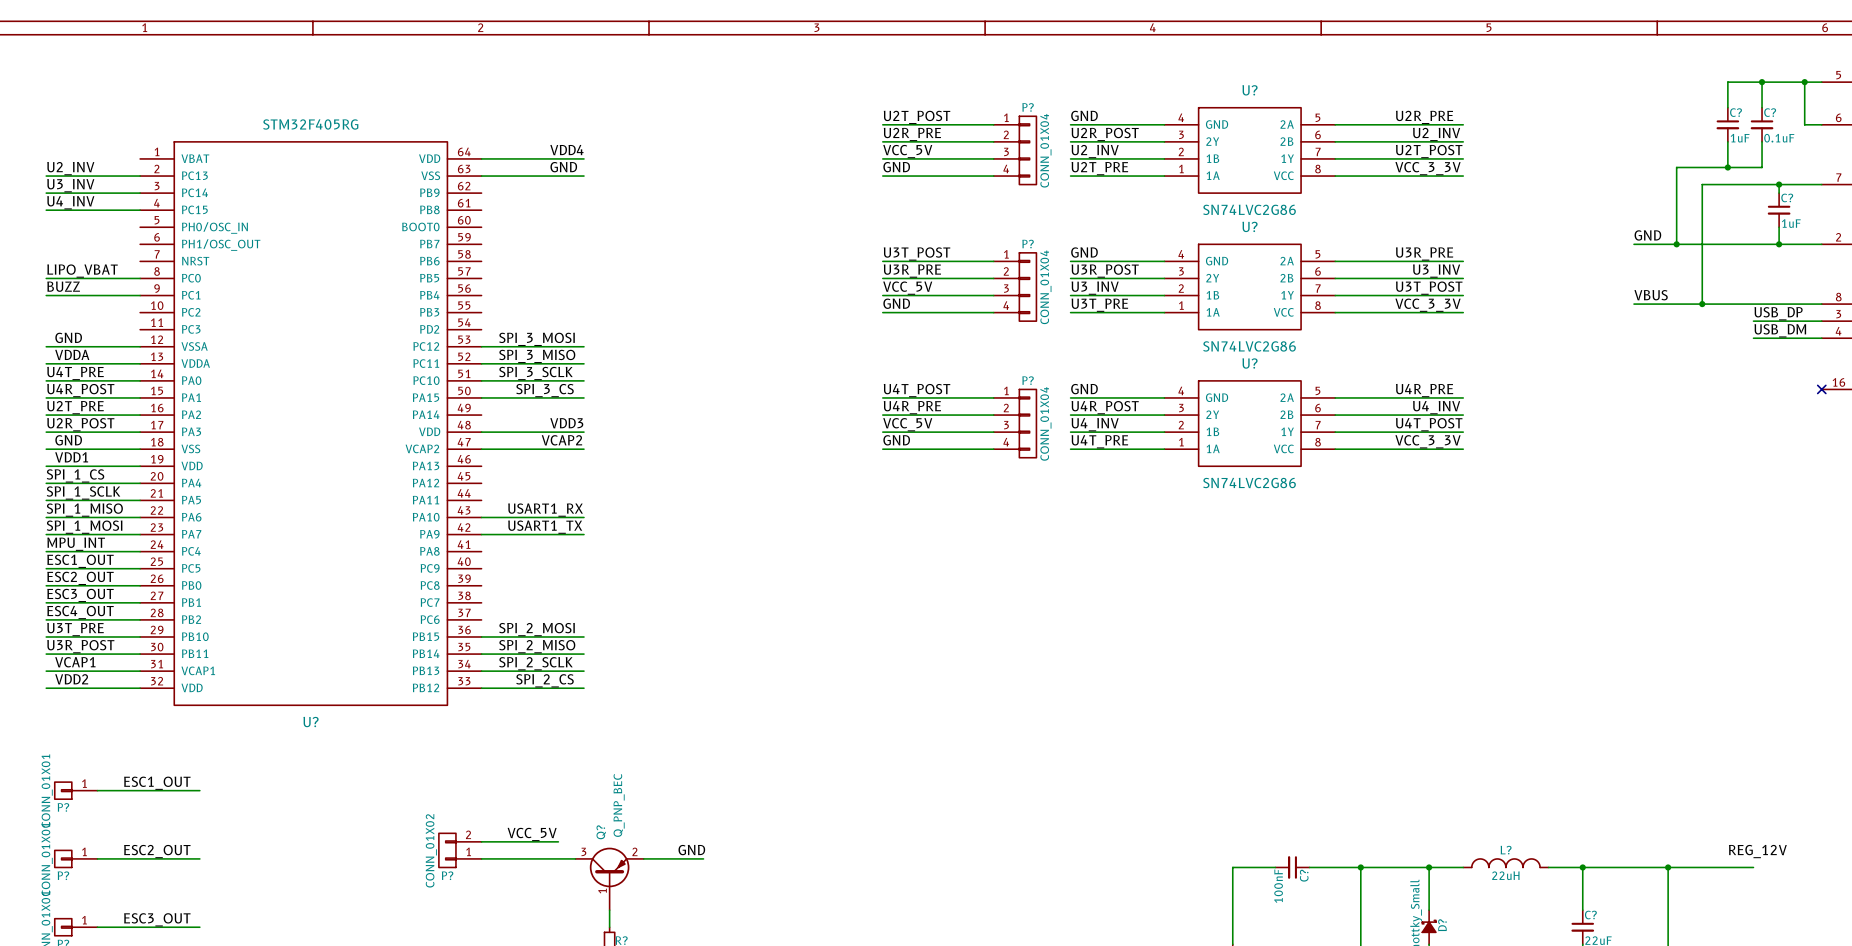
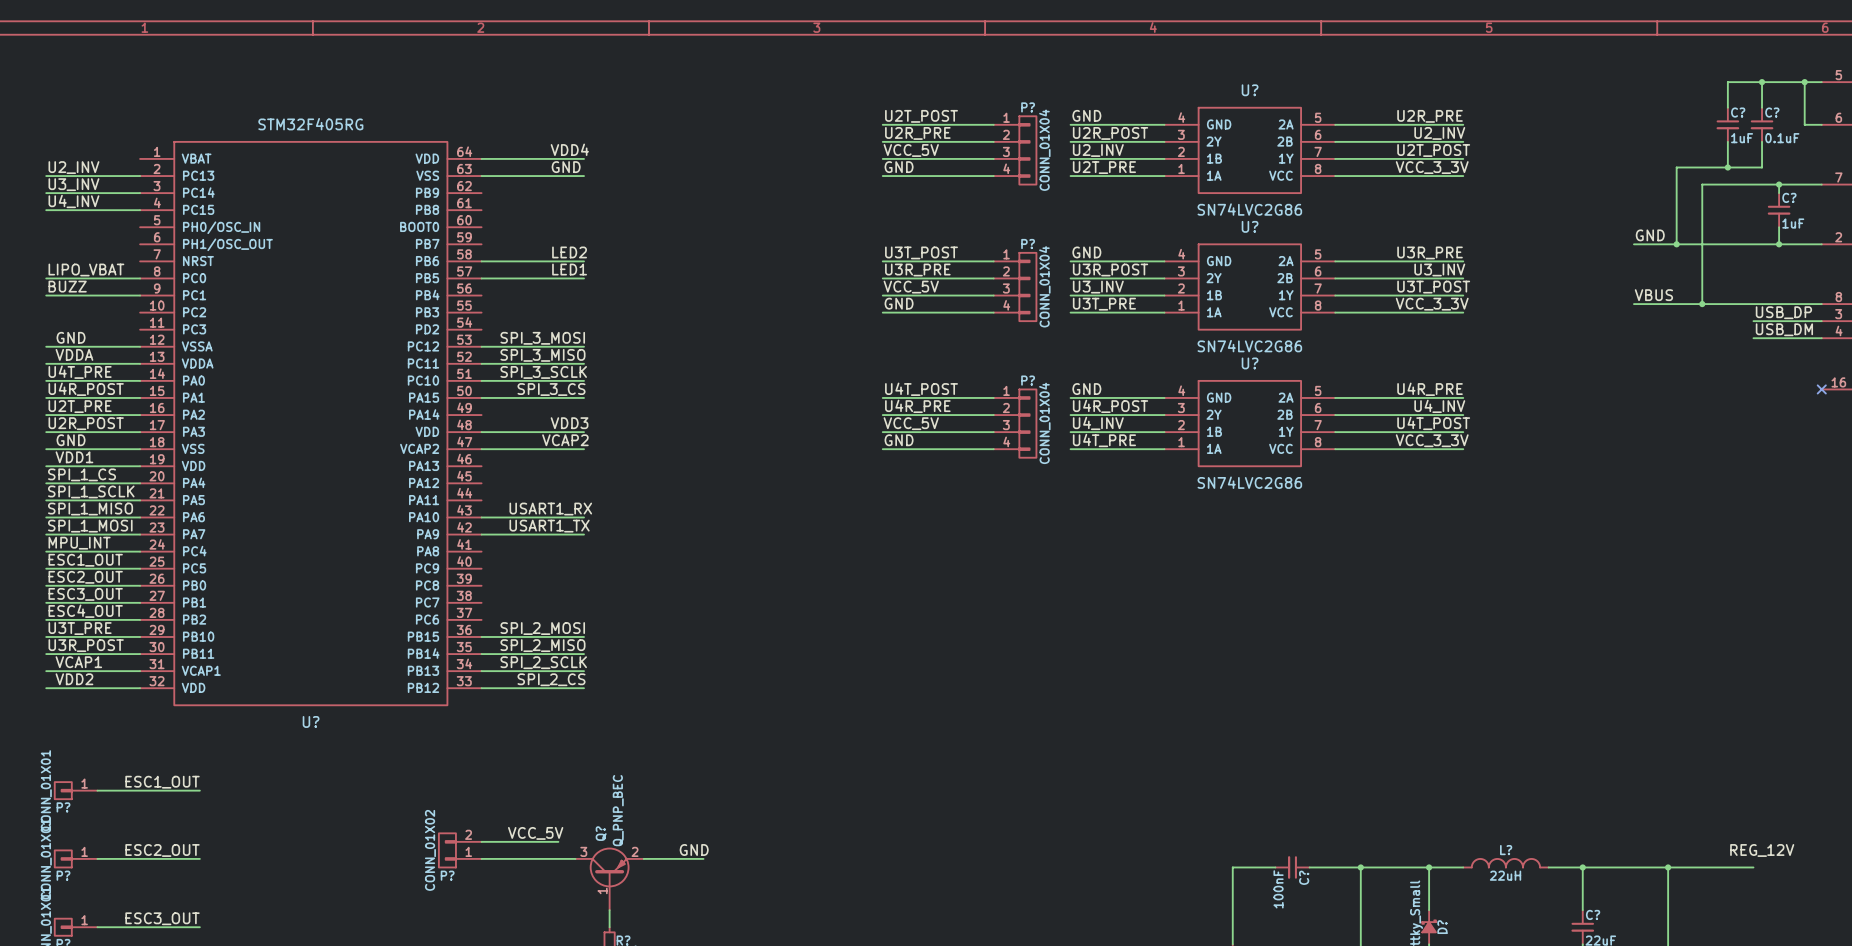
label: none -> LED2 (569, 252)
wire: none -> (481, 261) (584, 261)
label: none -> LED1 (569, 269)
wire: none -> (481, 278) (584, 278)

